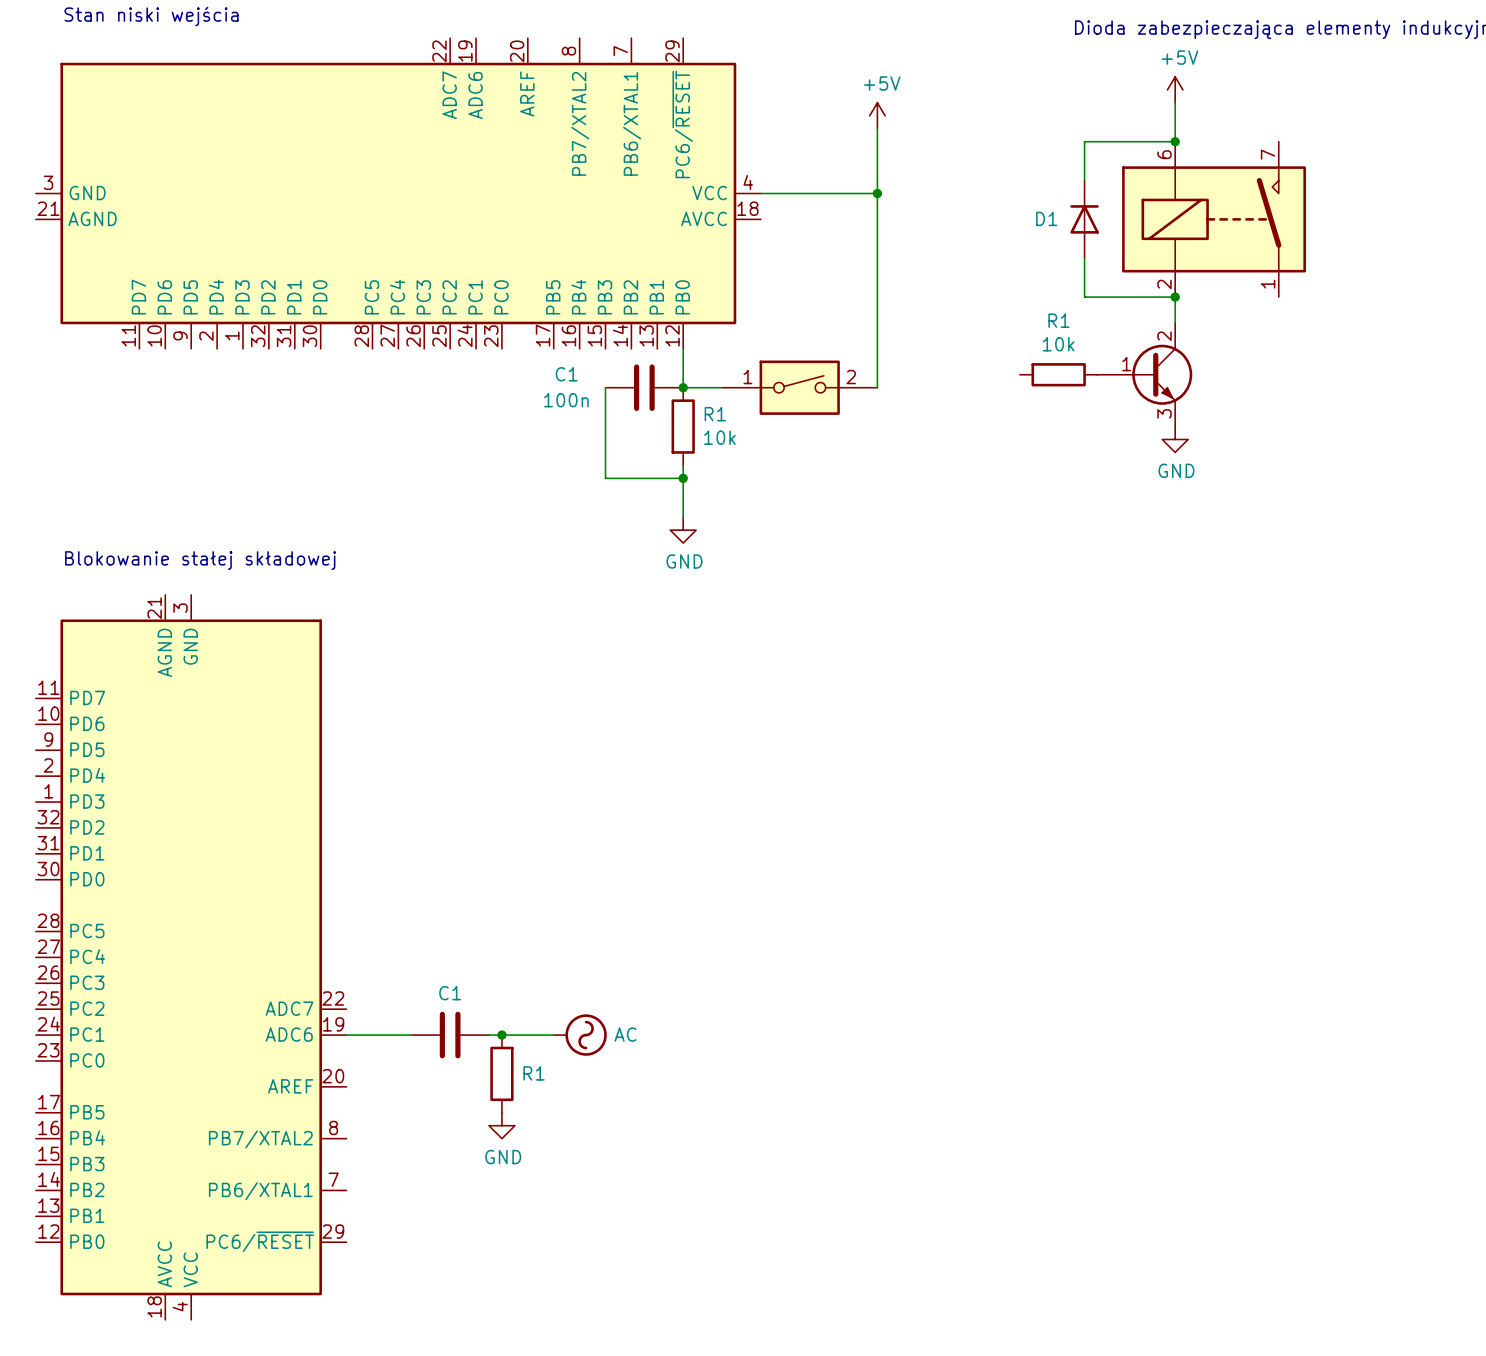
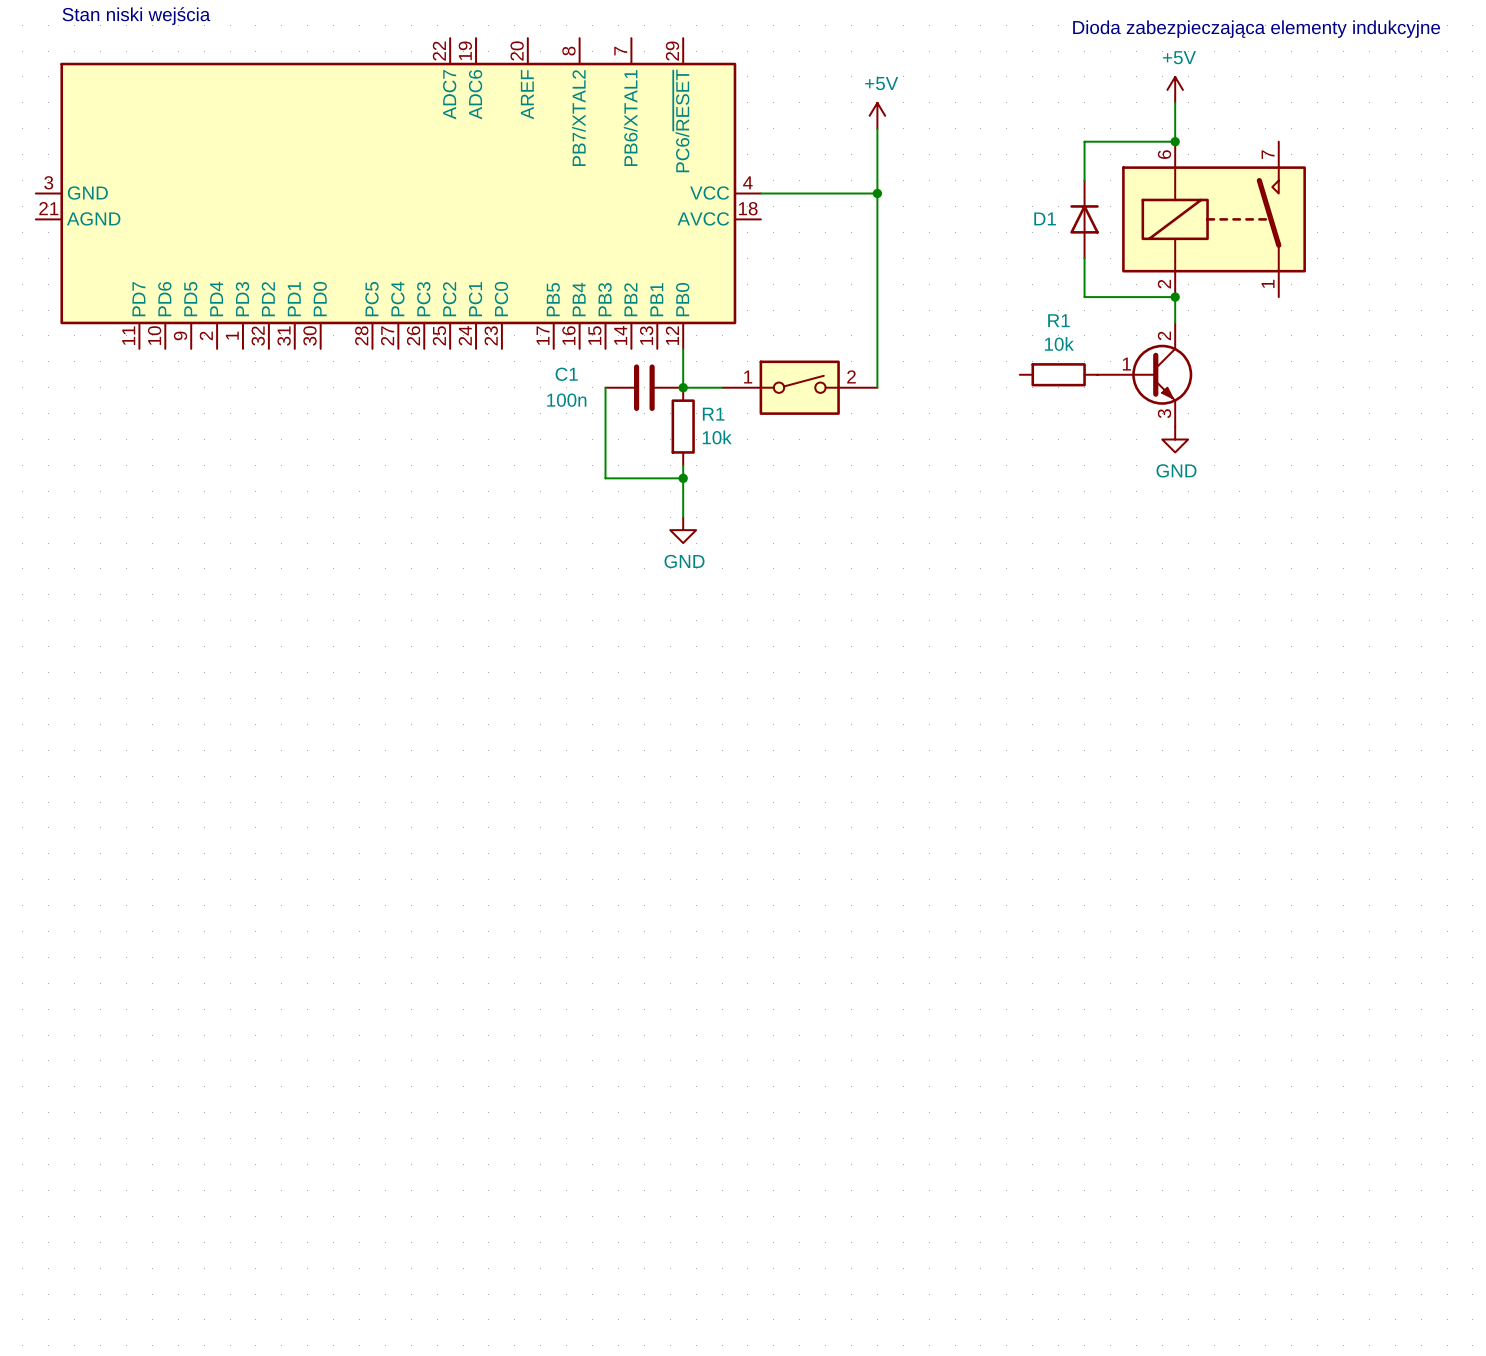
text: Blokowanie stałej składowej (200, 560) -> none
part: (191, 957) -> none
wire: (346, 1035) (411, 1035) -> none
C1: (450, 1035) -> none
wire: (488, 1035) (553, 1035) -> none
junction: (501, 1035) -> none
power symbol: AC (580, 1035) -> none
R1: (501, 1073) -> none
power symbol: GND (501, 1125) -> none

